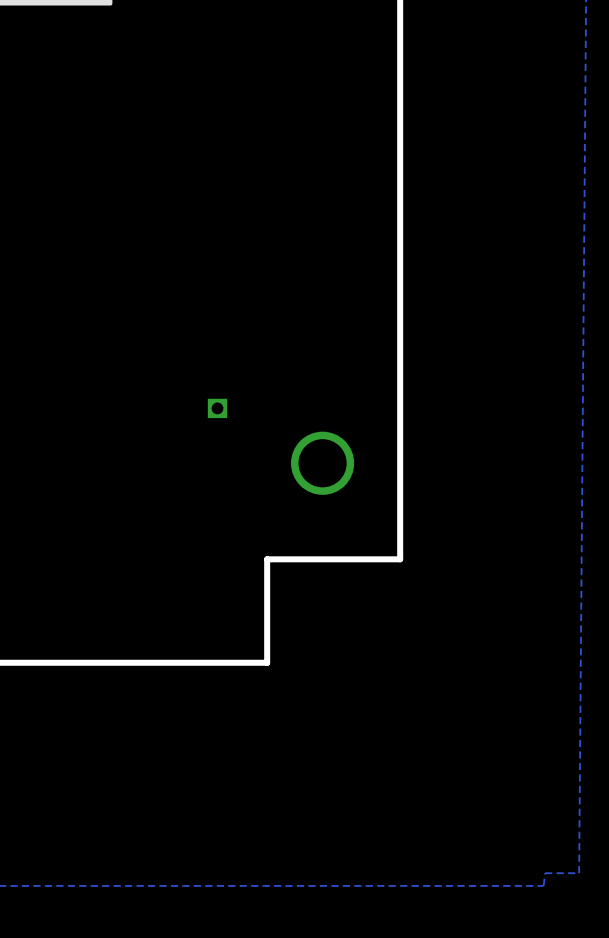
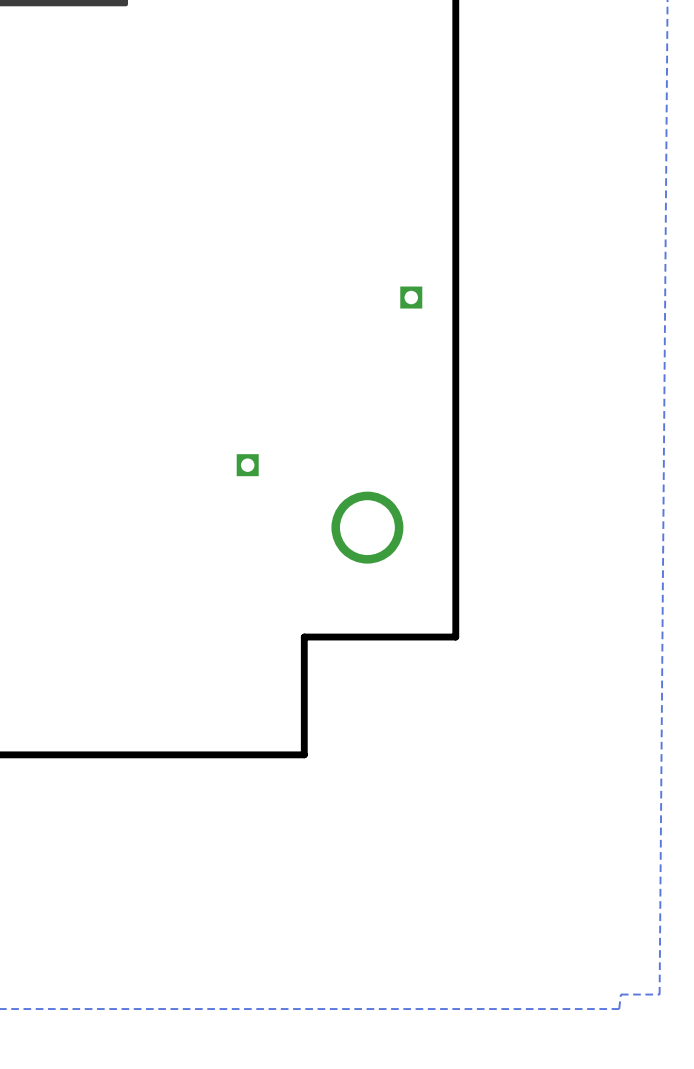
part: none -> (411, 297)

